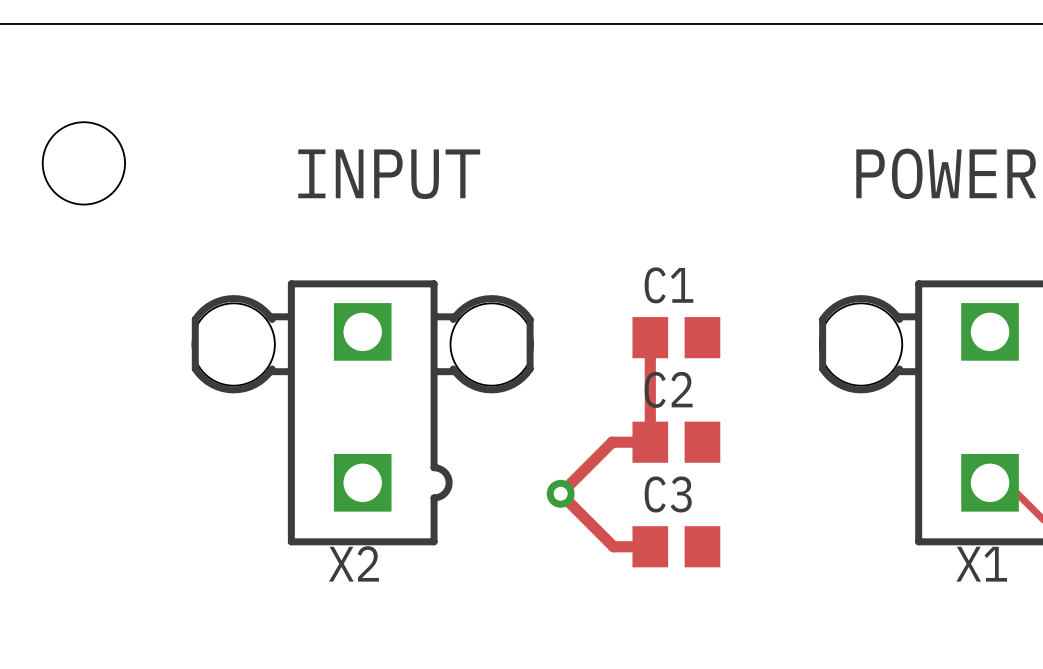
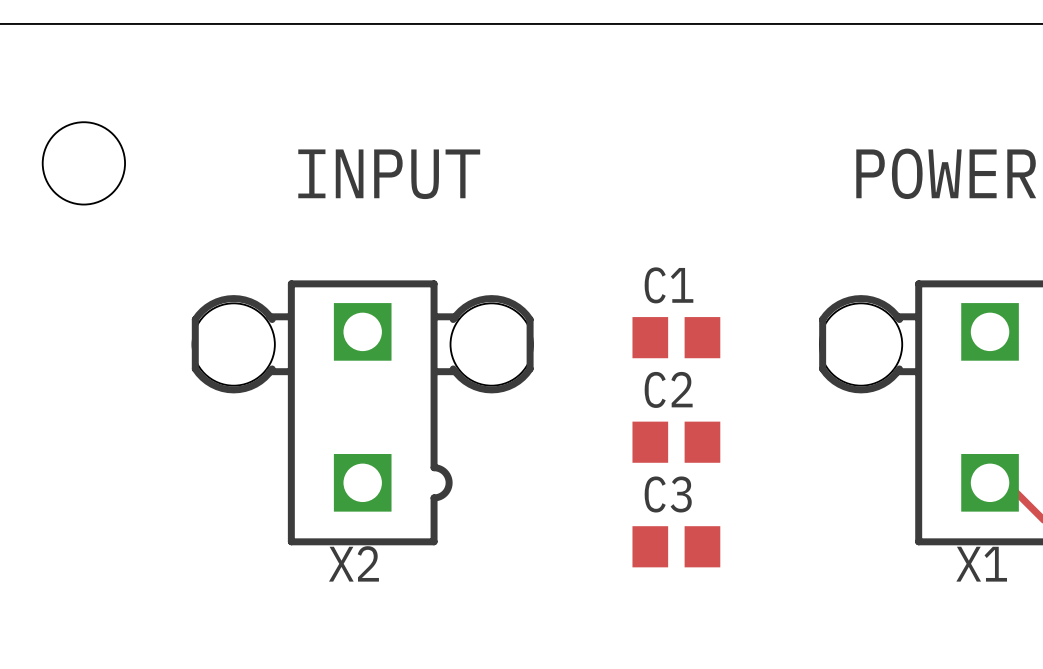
track: (650, 337) (650, 442) (612, 442) (560, 493) (613, 546) (650, 546) -> none
via: (560, 493) -> none

